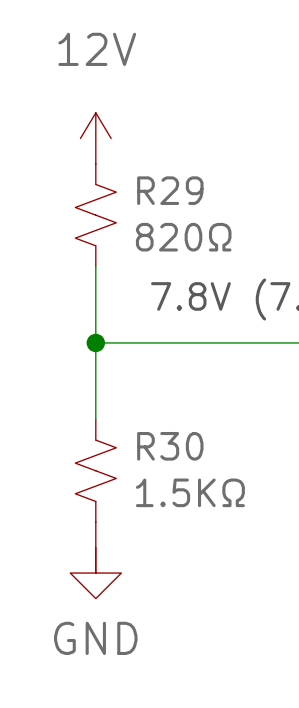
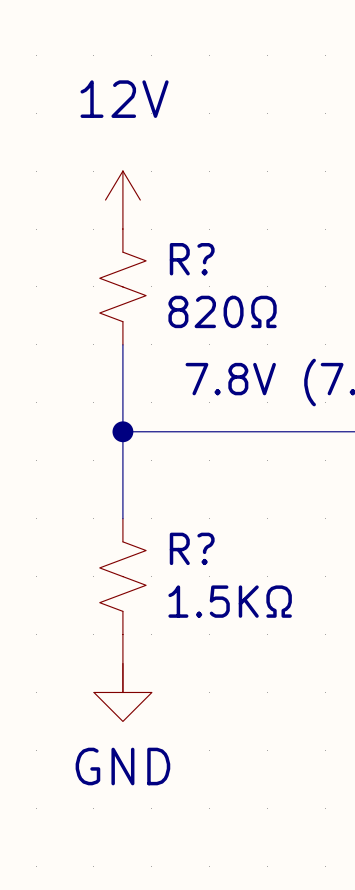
R29 name: R29 (170, 190) -> R? (192, 259)
R30 name: R30 (170, 446) -> R? (192, 548)

